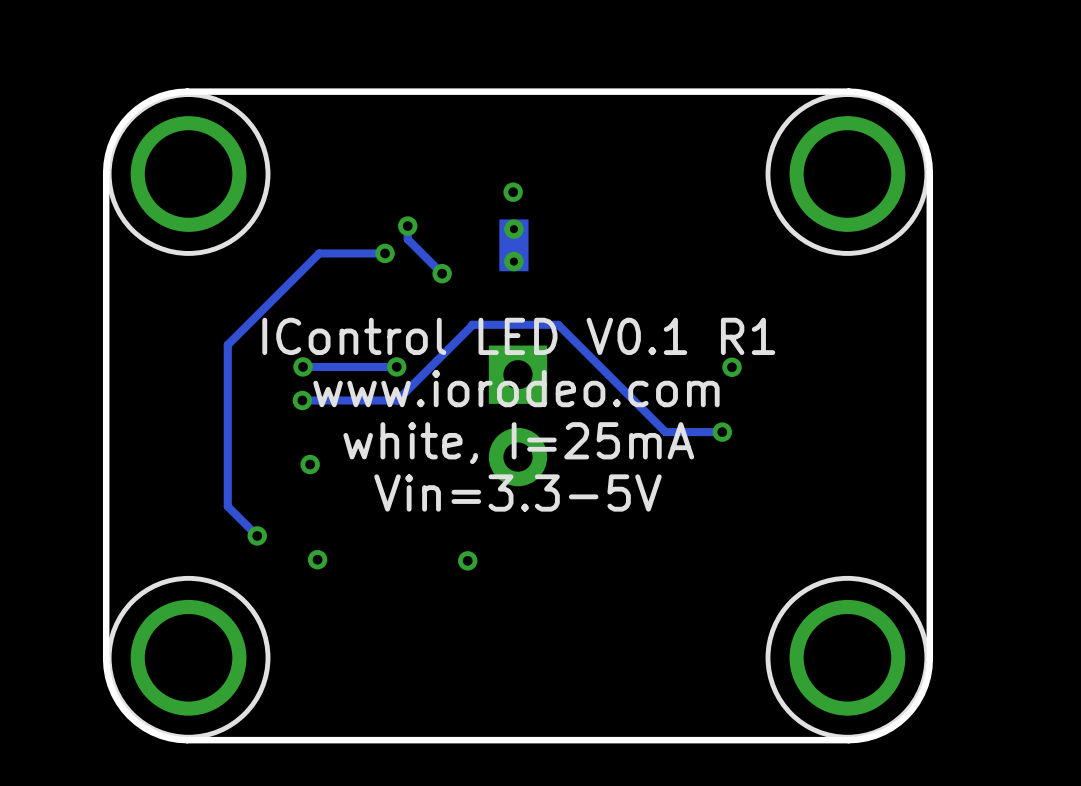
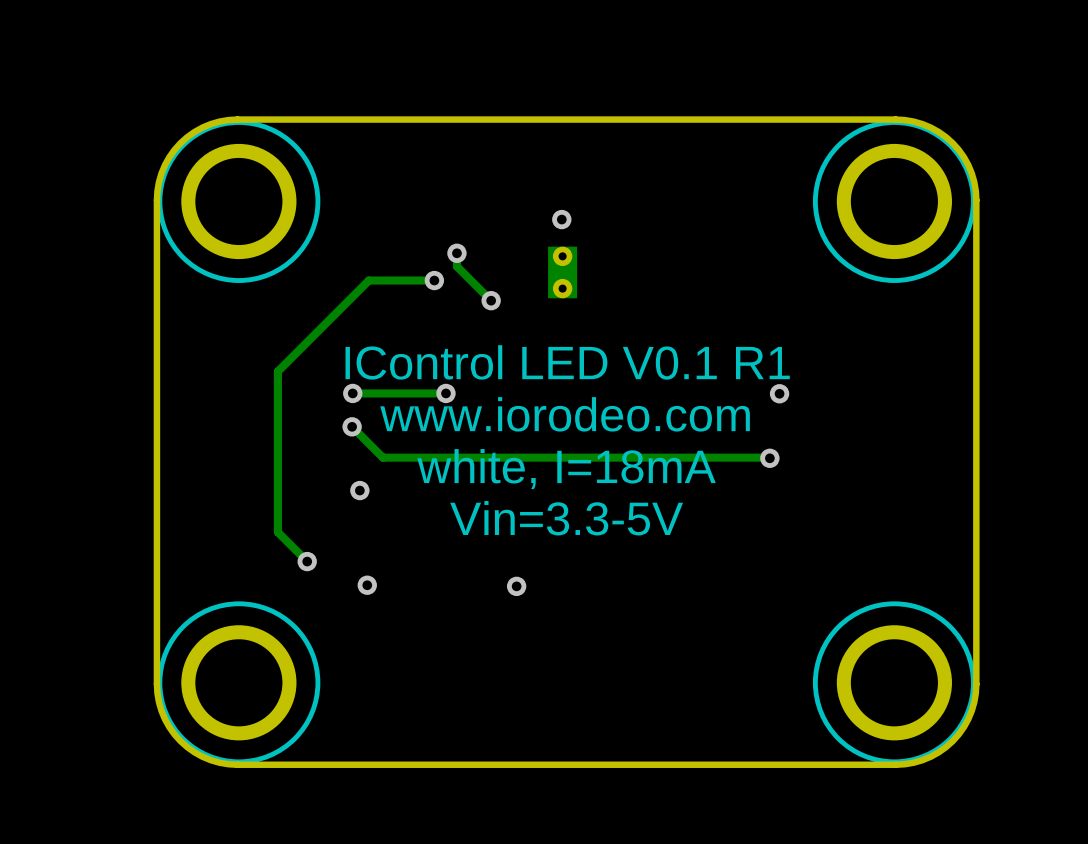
track: (472, 324) (558, 324) (665, 432) (722, 432) -> (352, 426) (382, 457) (769, 458)
track: (472, 325) (397, 400) (302, 400) -> none
part: (518, 415) -> none
text: white, I=25mA (518, 443) -> white, I=18mA (566, 469)

